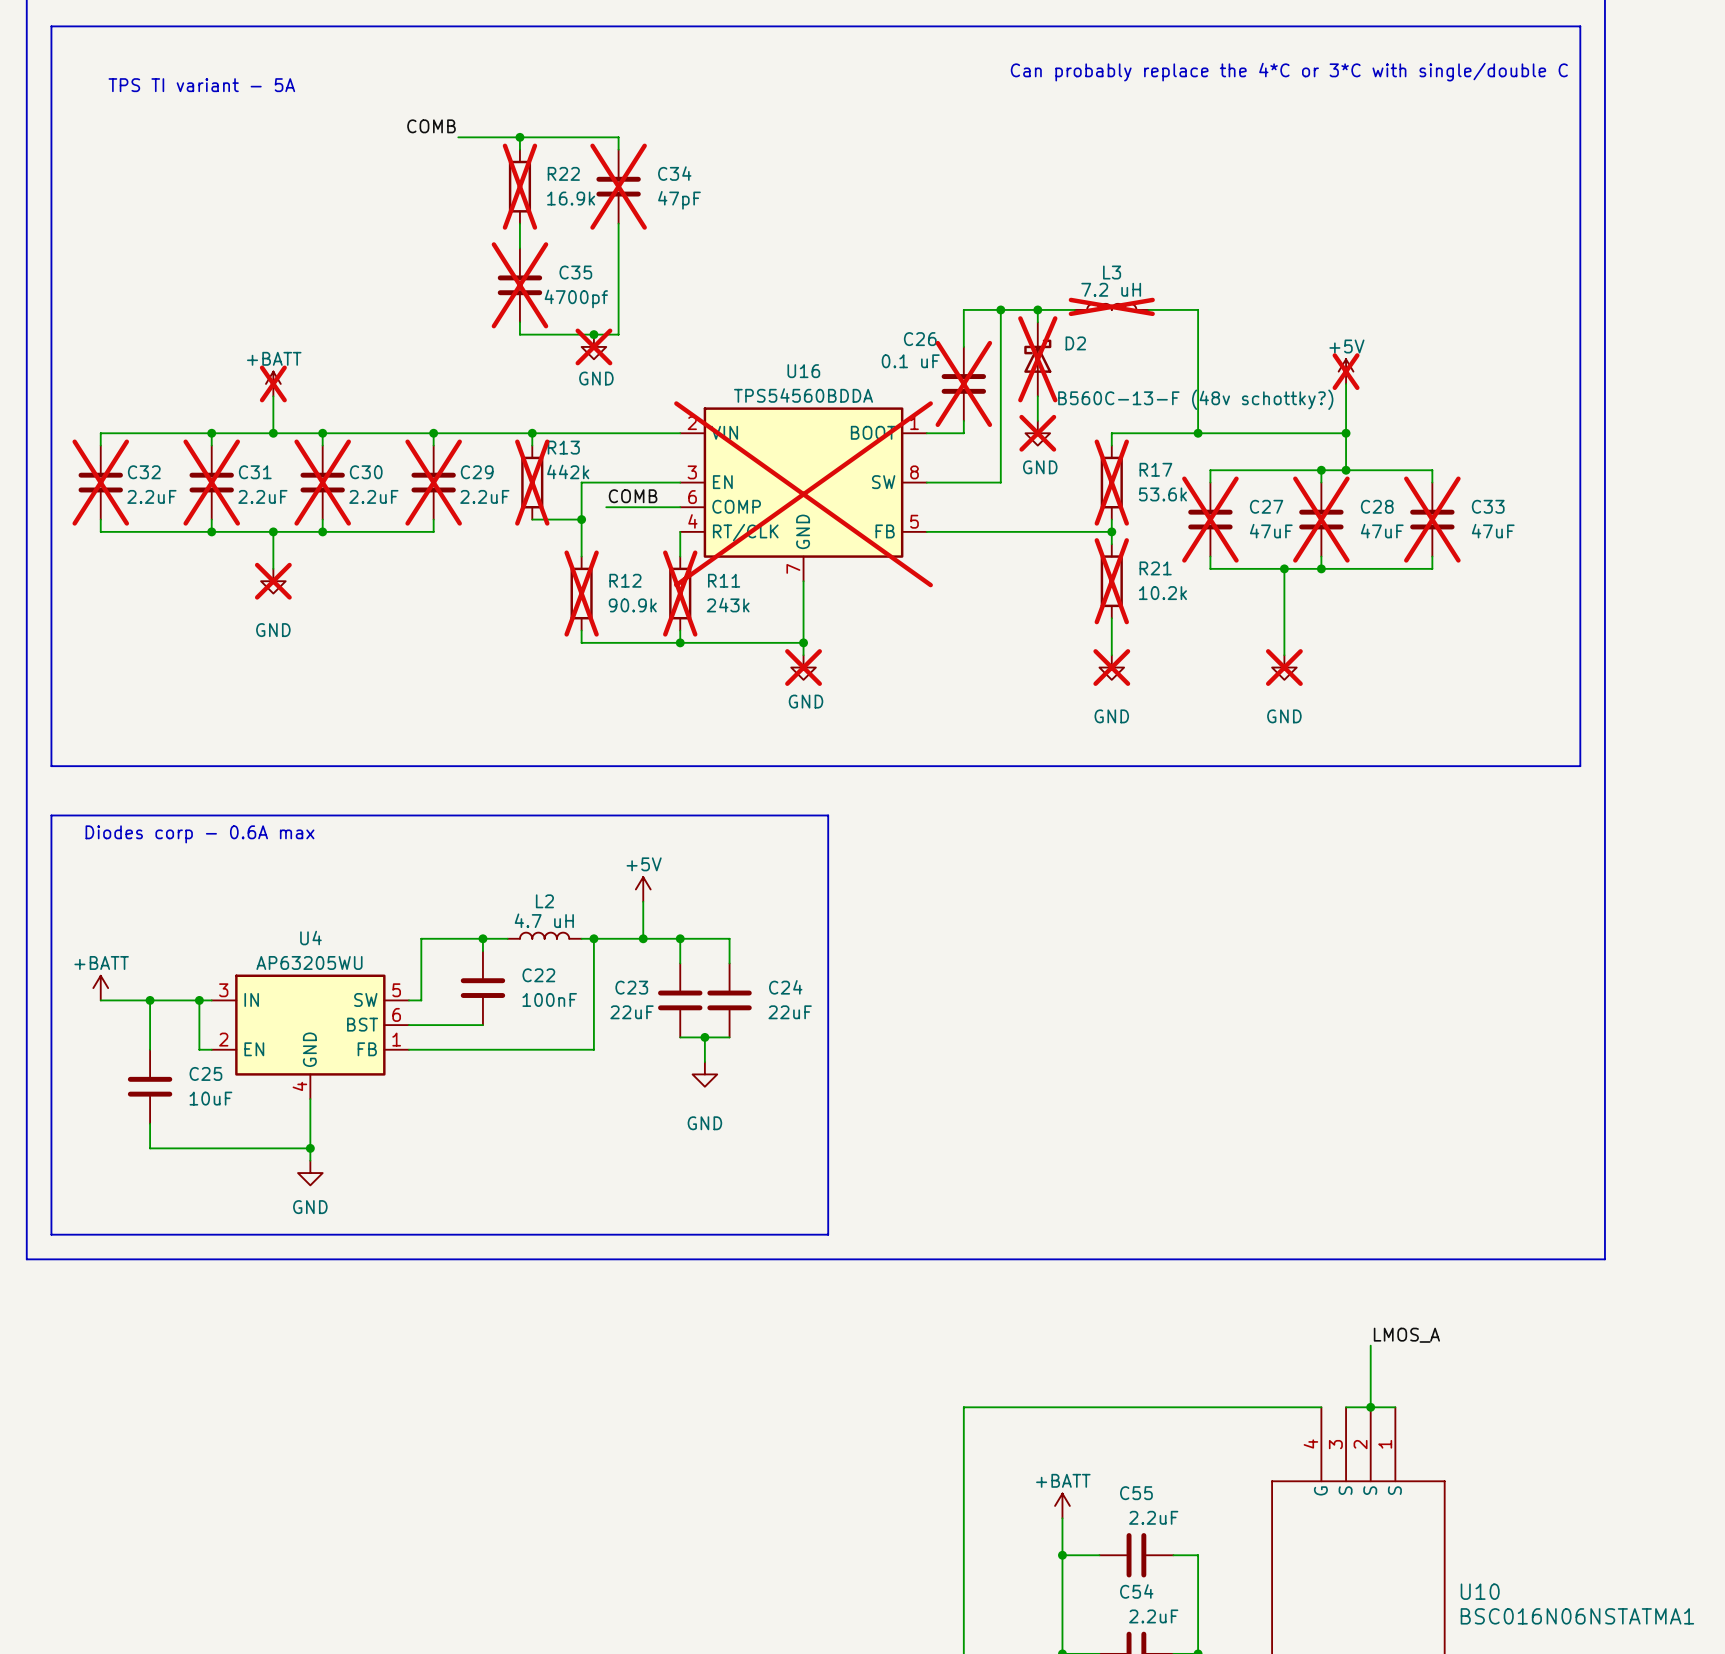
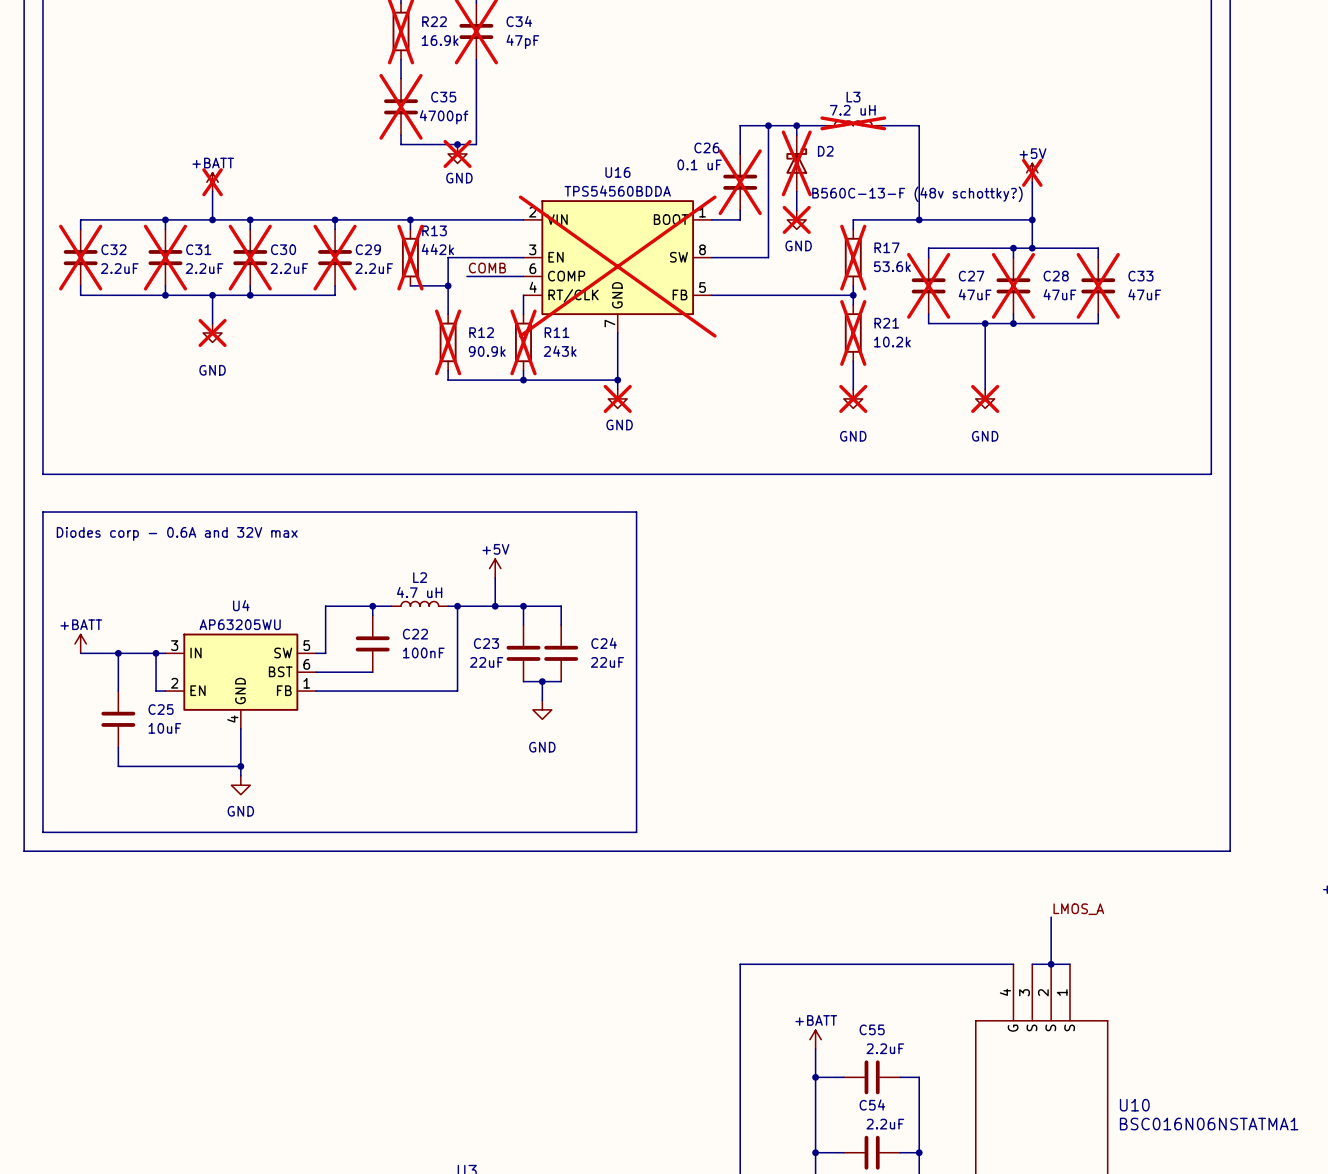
text: Diodes corp - 0.6A max (199, 834) -> Diodes corp - 0.6A and 32V max (177, 533)

